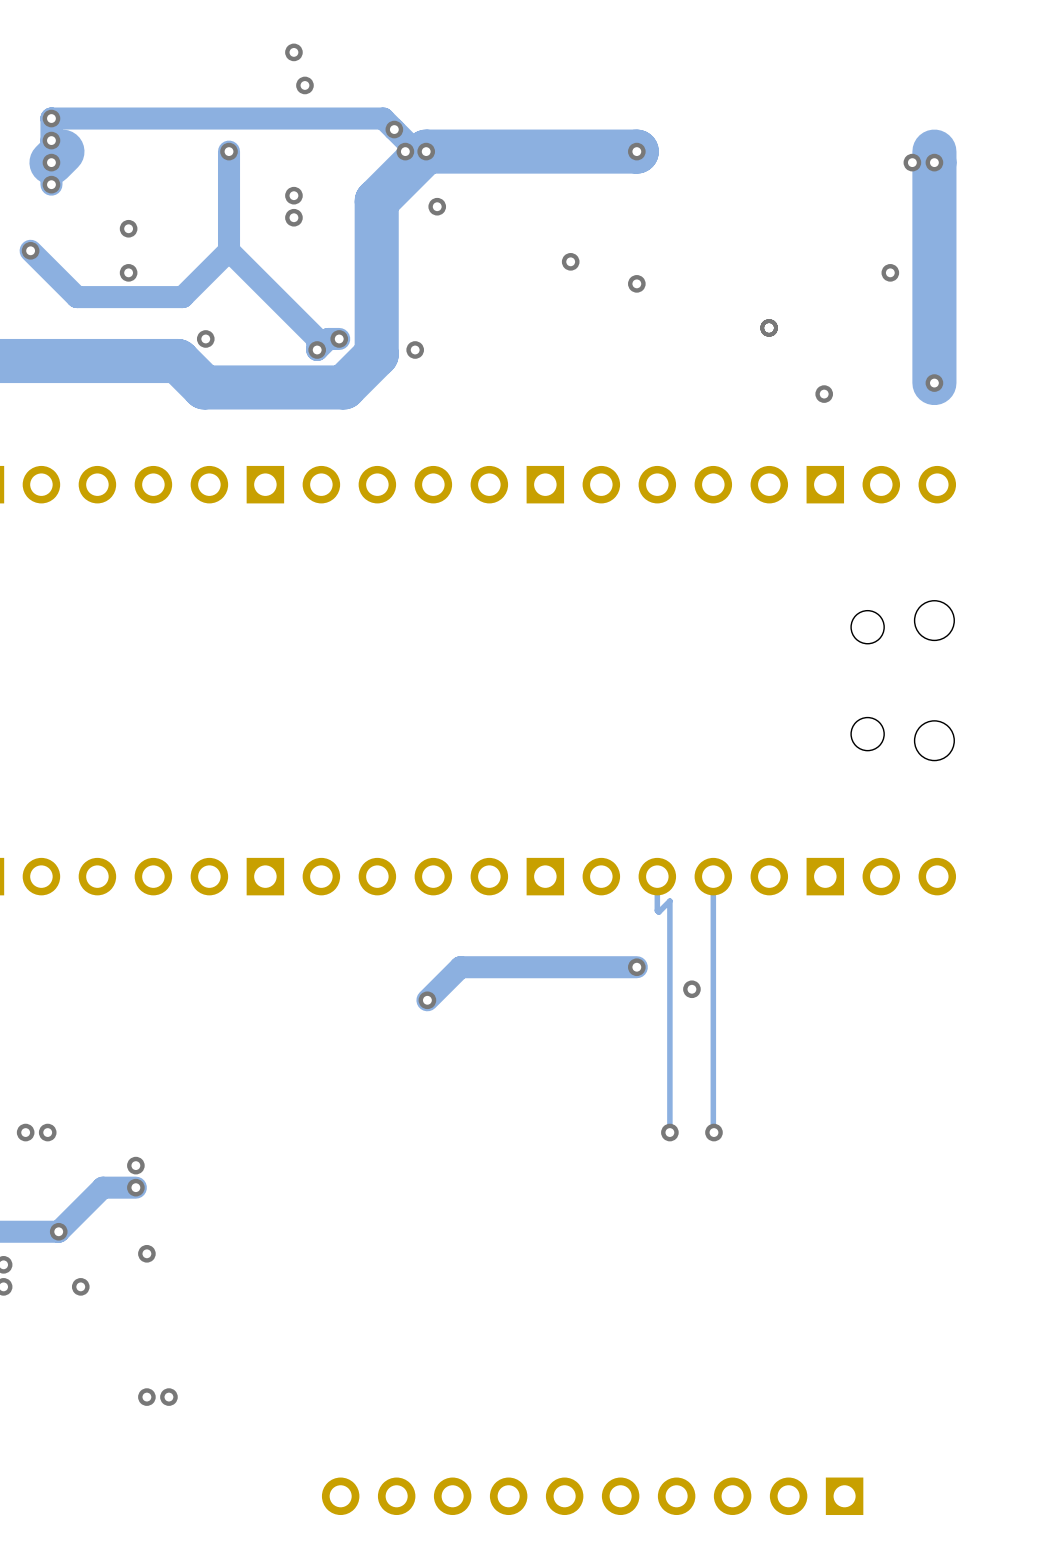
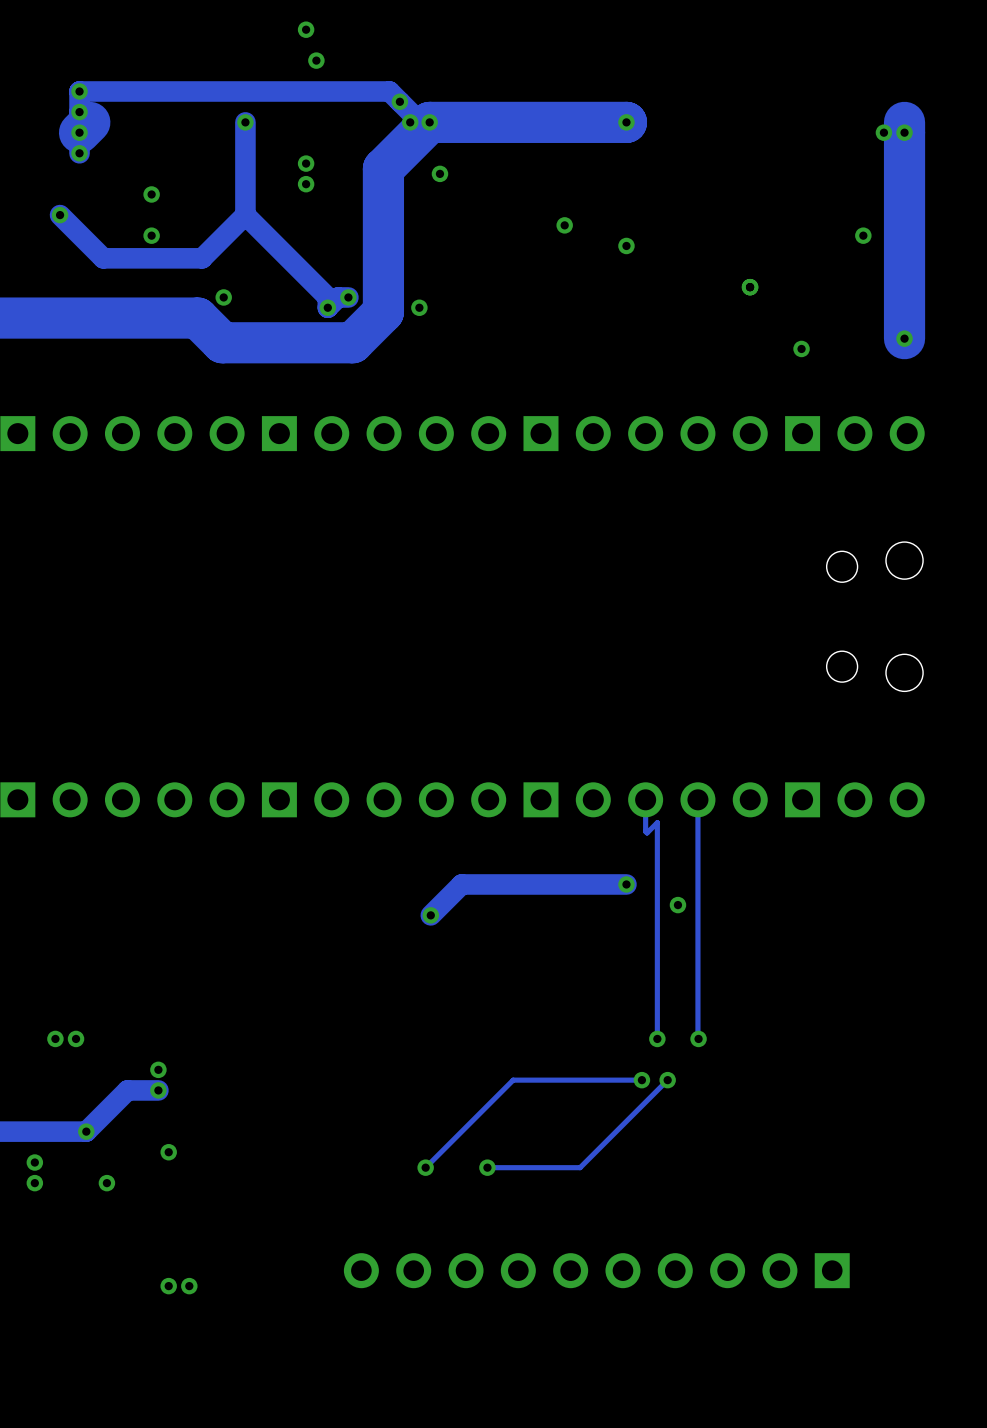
track: none -> (641, 1080) (513, 1080) (425, 1167)
via: none -> (641, 1080)
track: none -> (667, 1080) (580, 1167) (487, 1167)
via: none -> (667, 1080)
via: none -> (425, 1167)
via: none -> (487, 1167)
part position: (592, 1496) -> (596, 1270)

